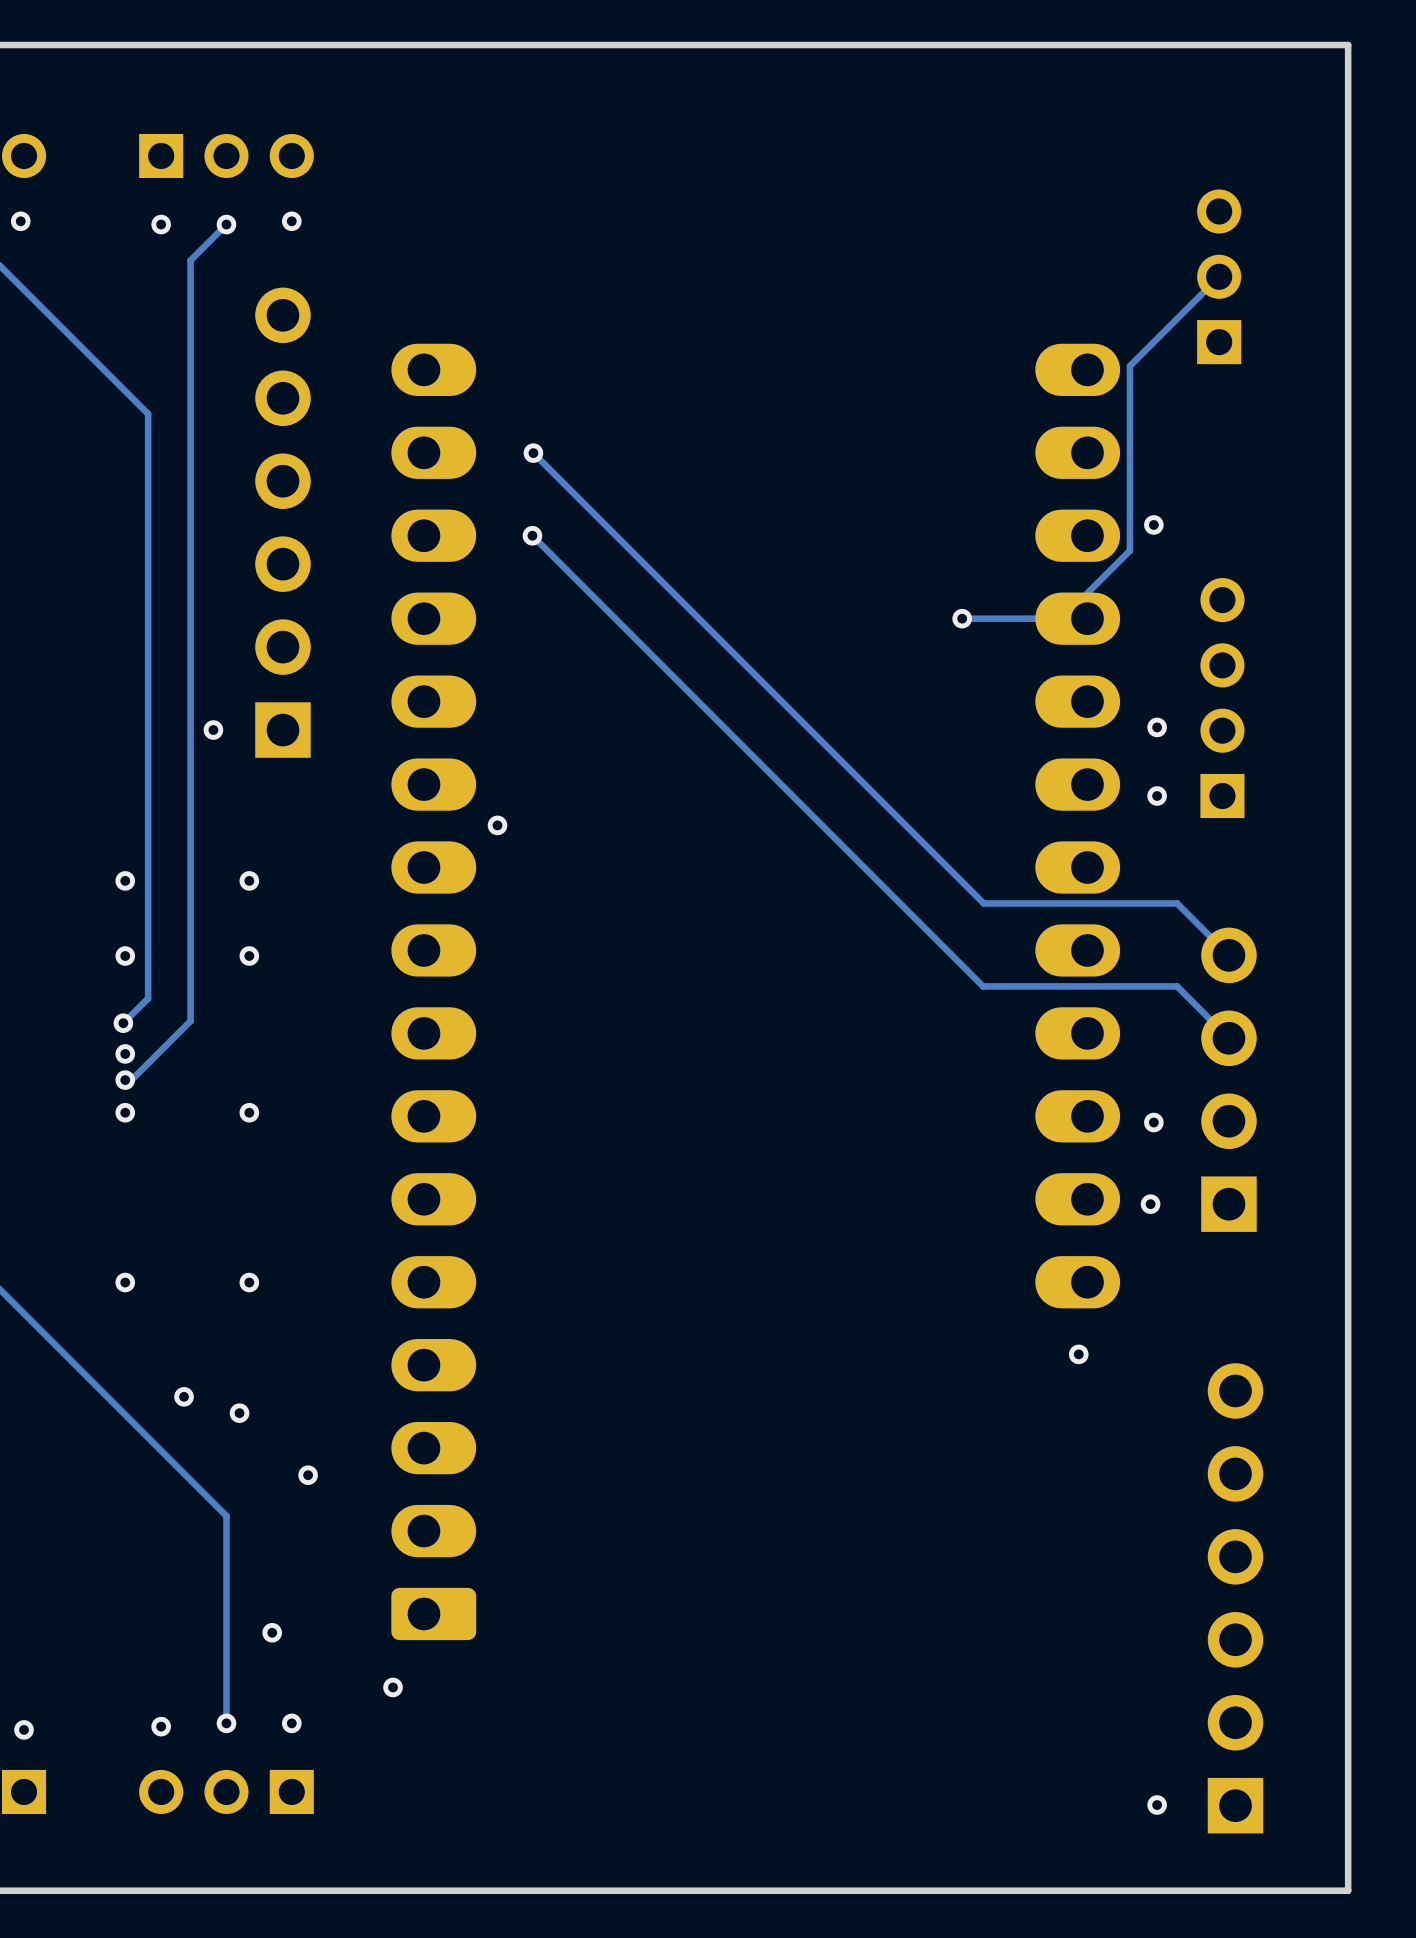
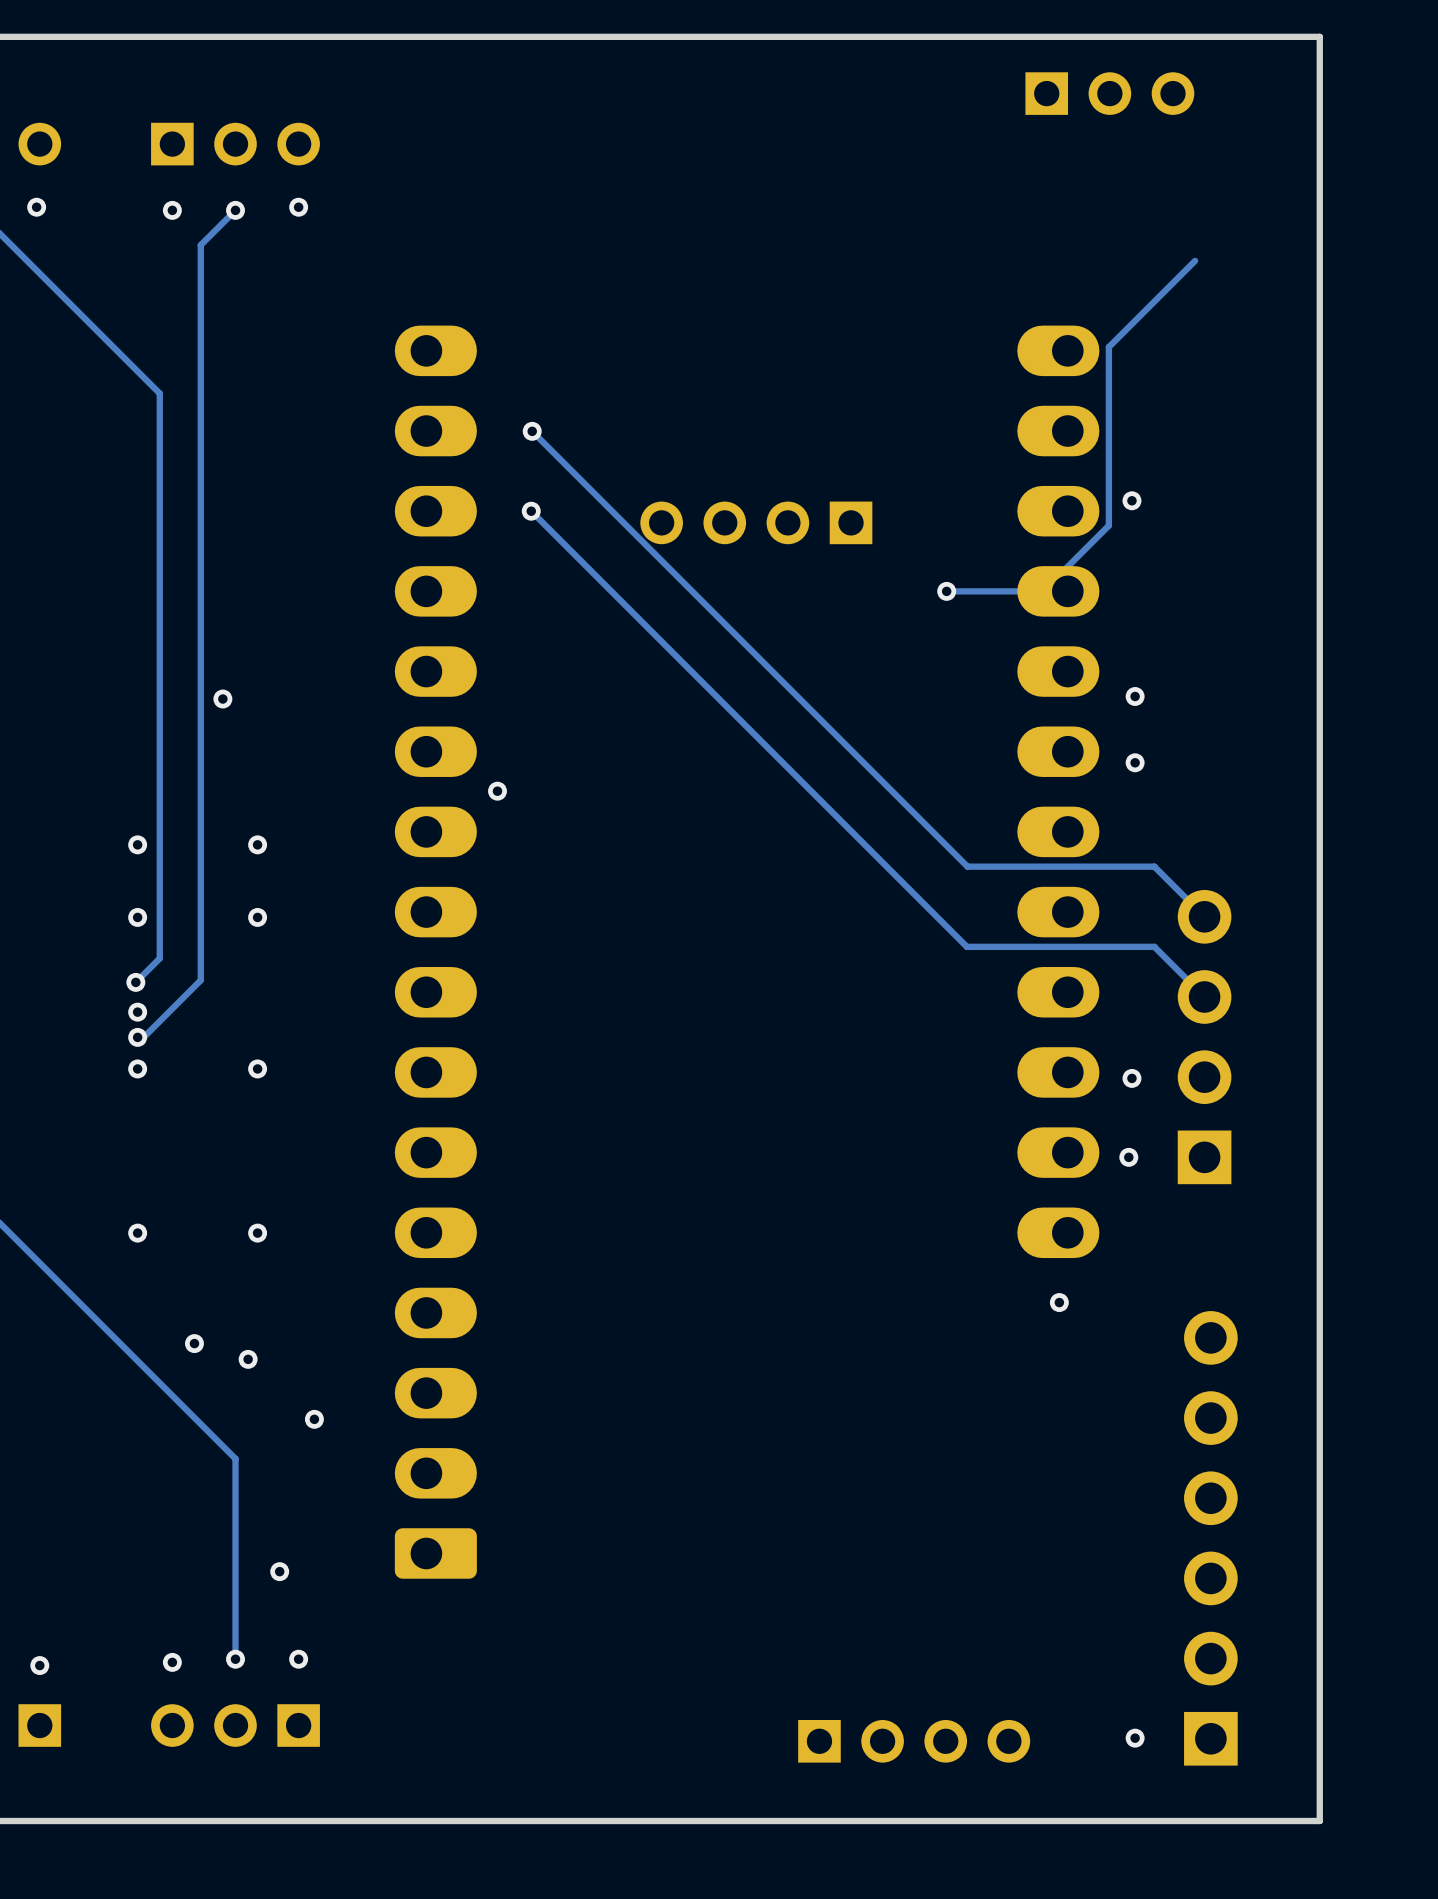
part rotation: 0° (1219, 276) -> 90° clockwise (1109, 93)
part position: (1219, 276) -> (1109, 93)
part: (282, 522) -> none
part rotation: 0° (1222, 698) -> 90° counterclockwise (756, 522)
part position: (1222, 698) -> (756, 522)
via: (393, 1687) -> none
part: none -> (914, 1741)

